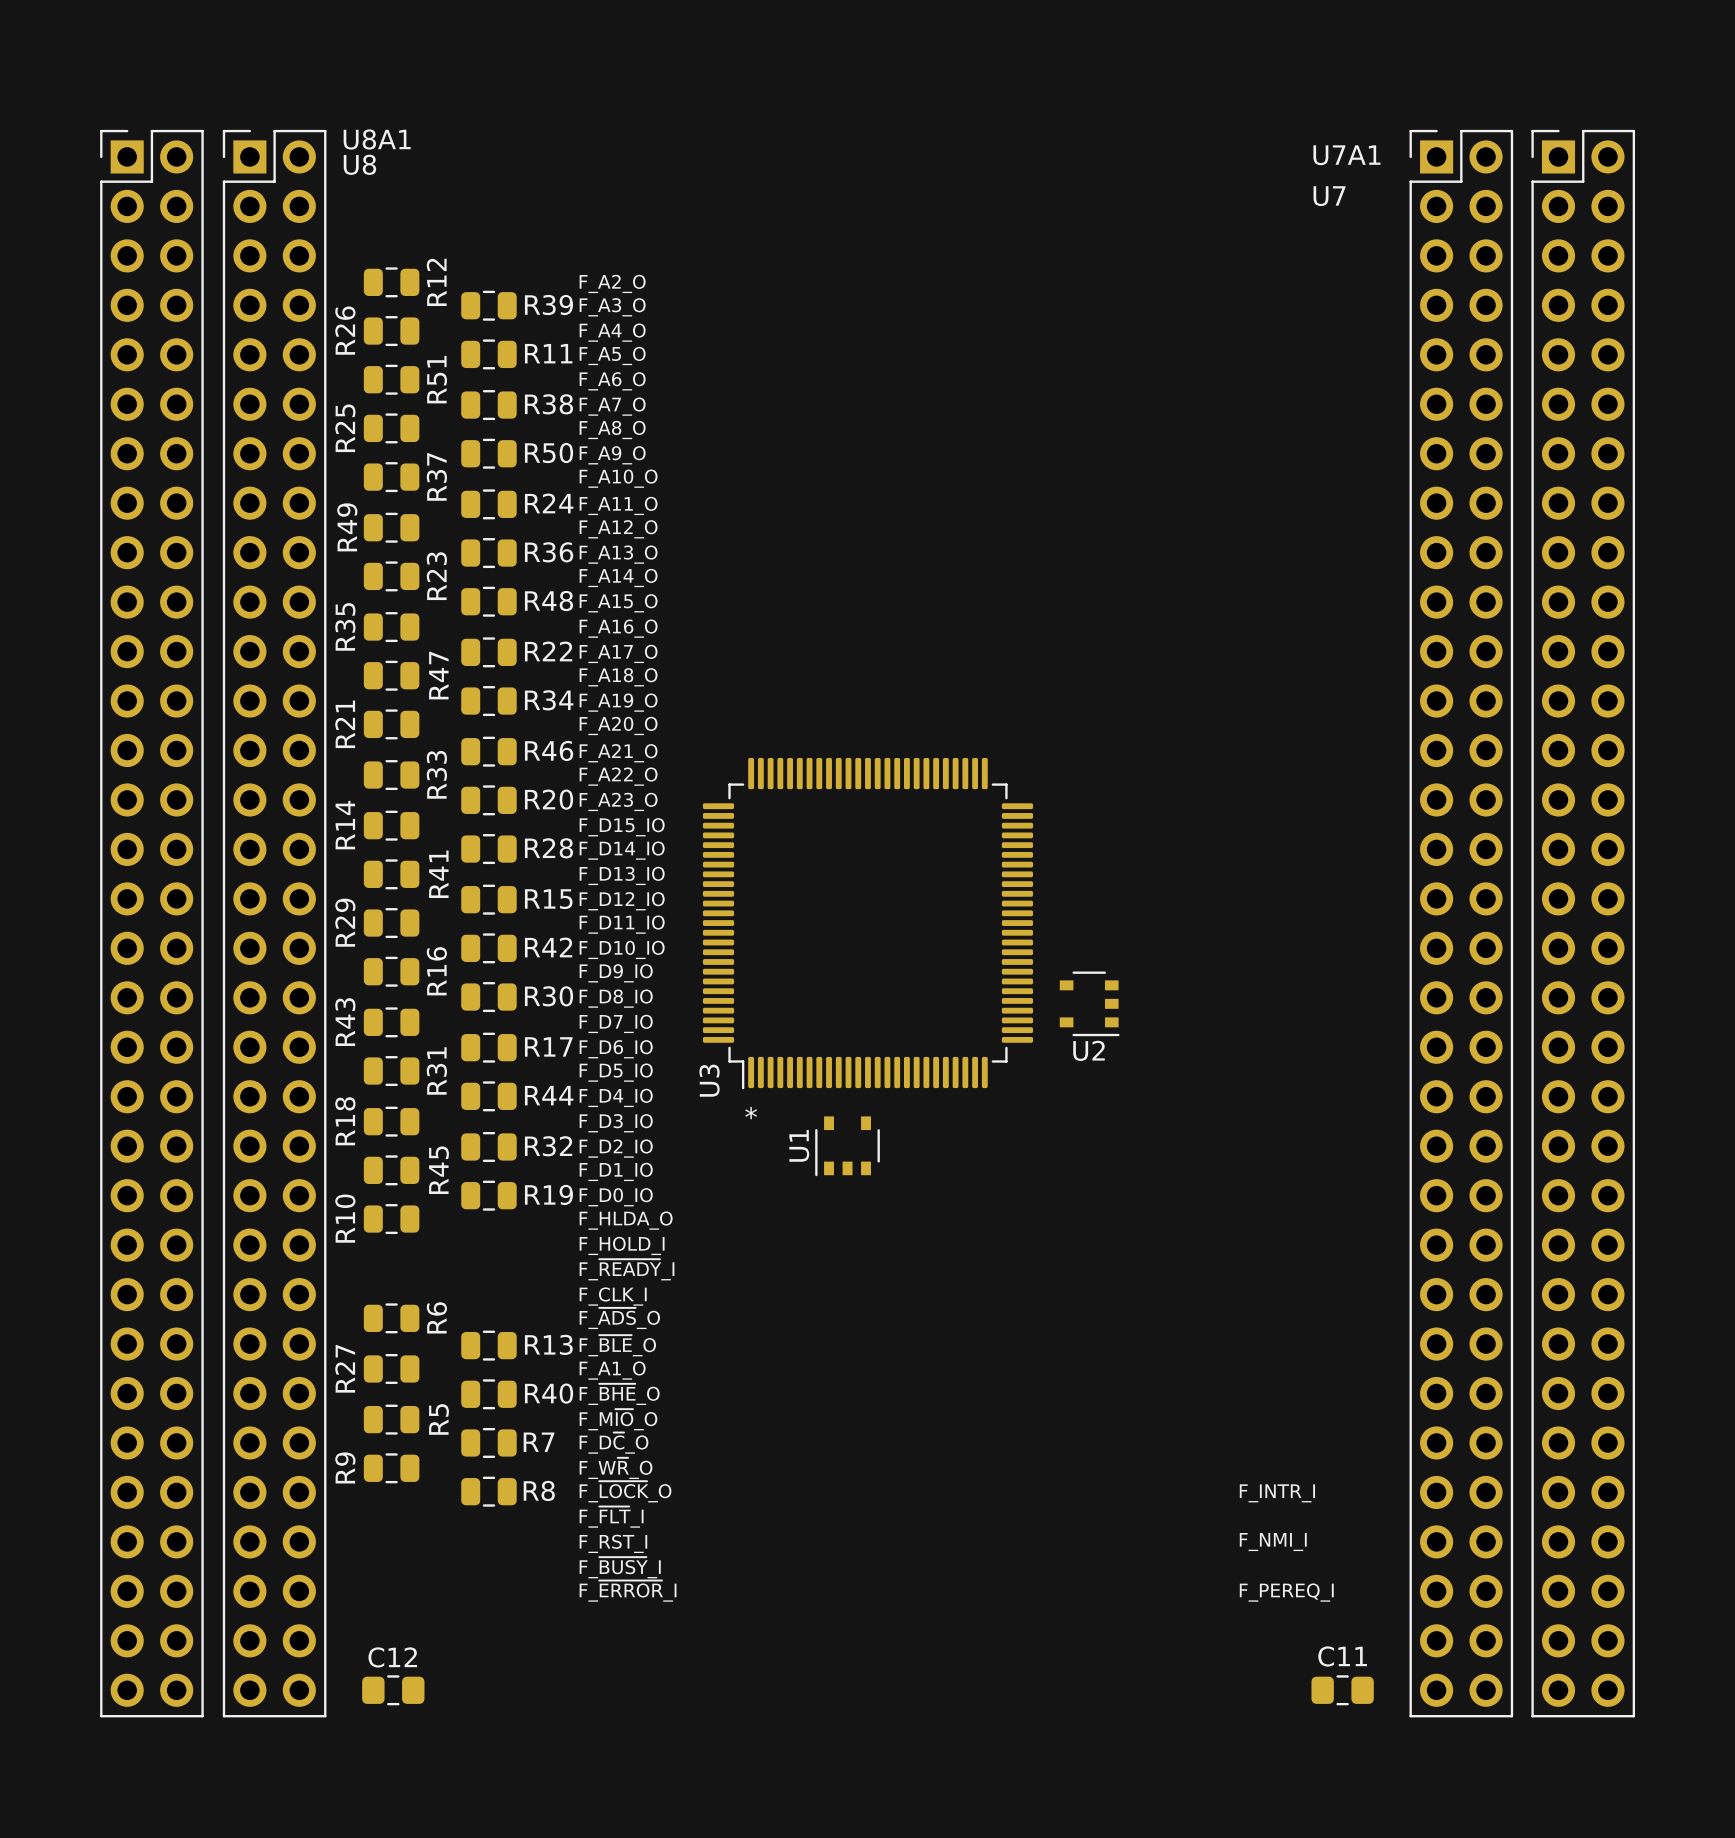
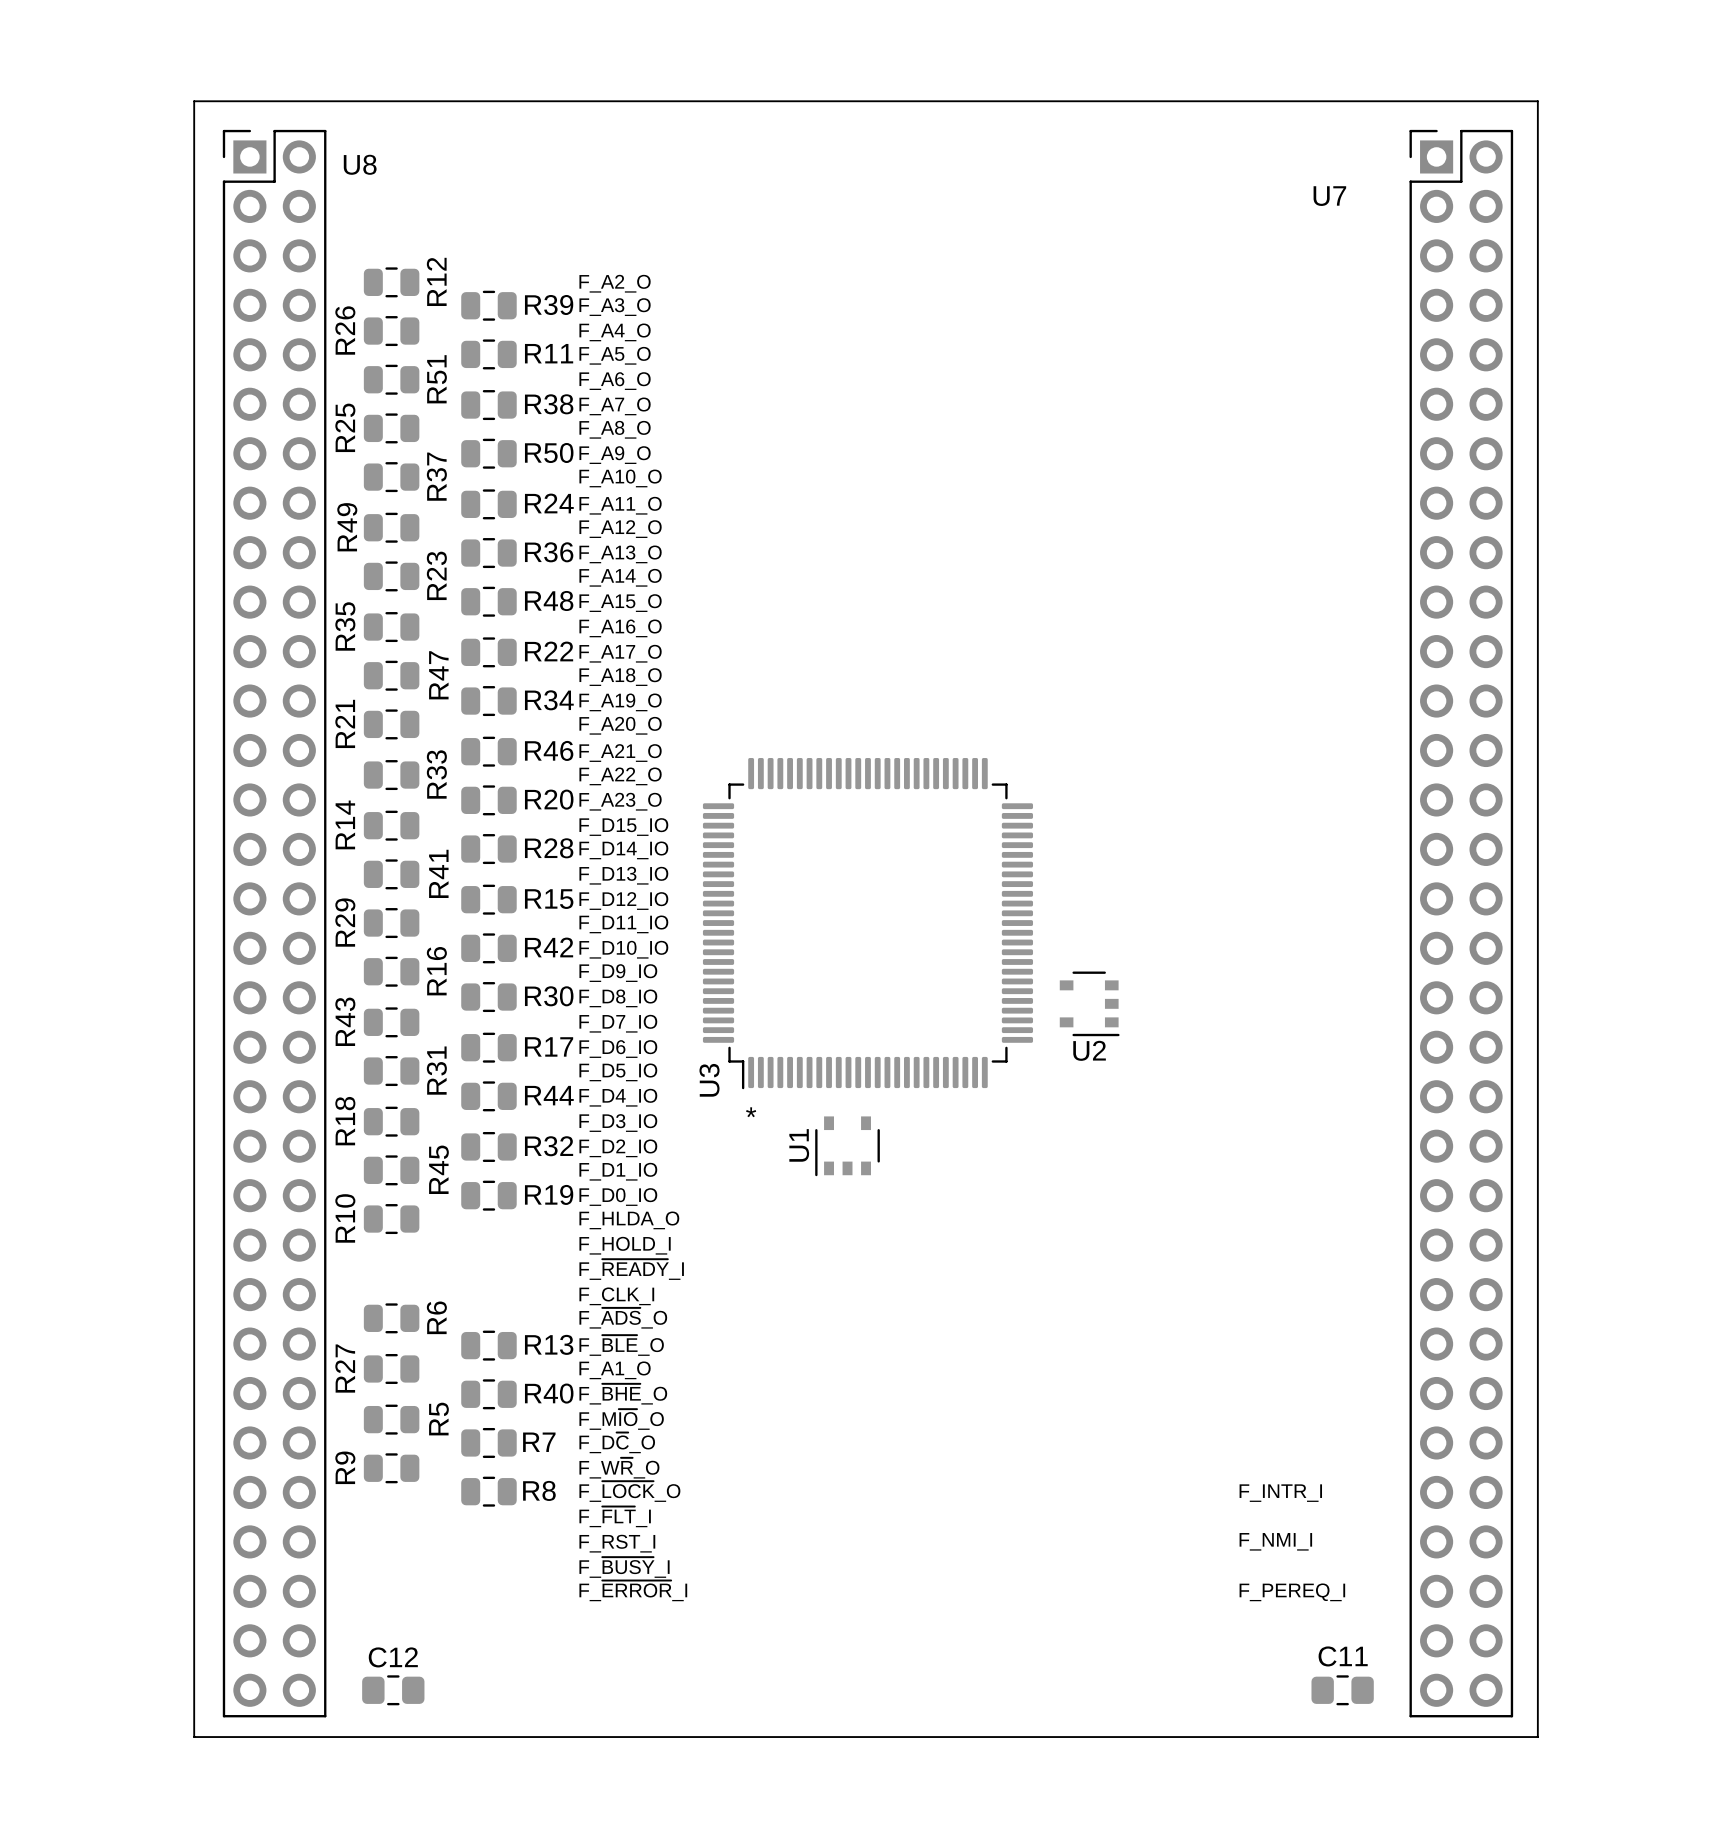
board edge: none -> (194, 101) (194, 1737) (1537, 1737) (1537, 101) (194, 101)
U8A1: (151, 923) -> none
U7A1: (1583, 923) -> none

